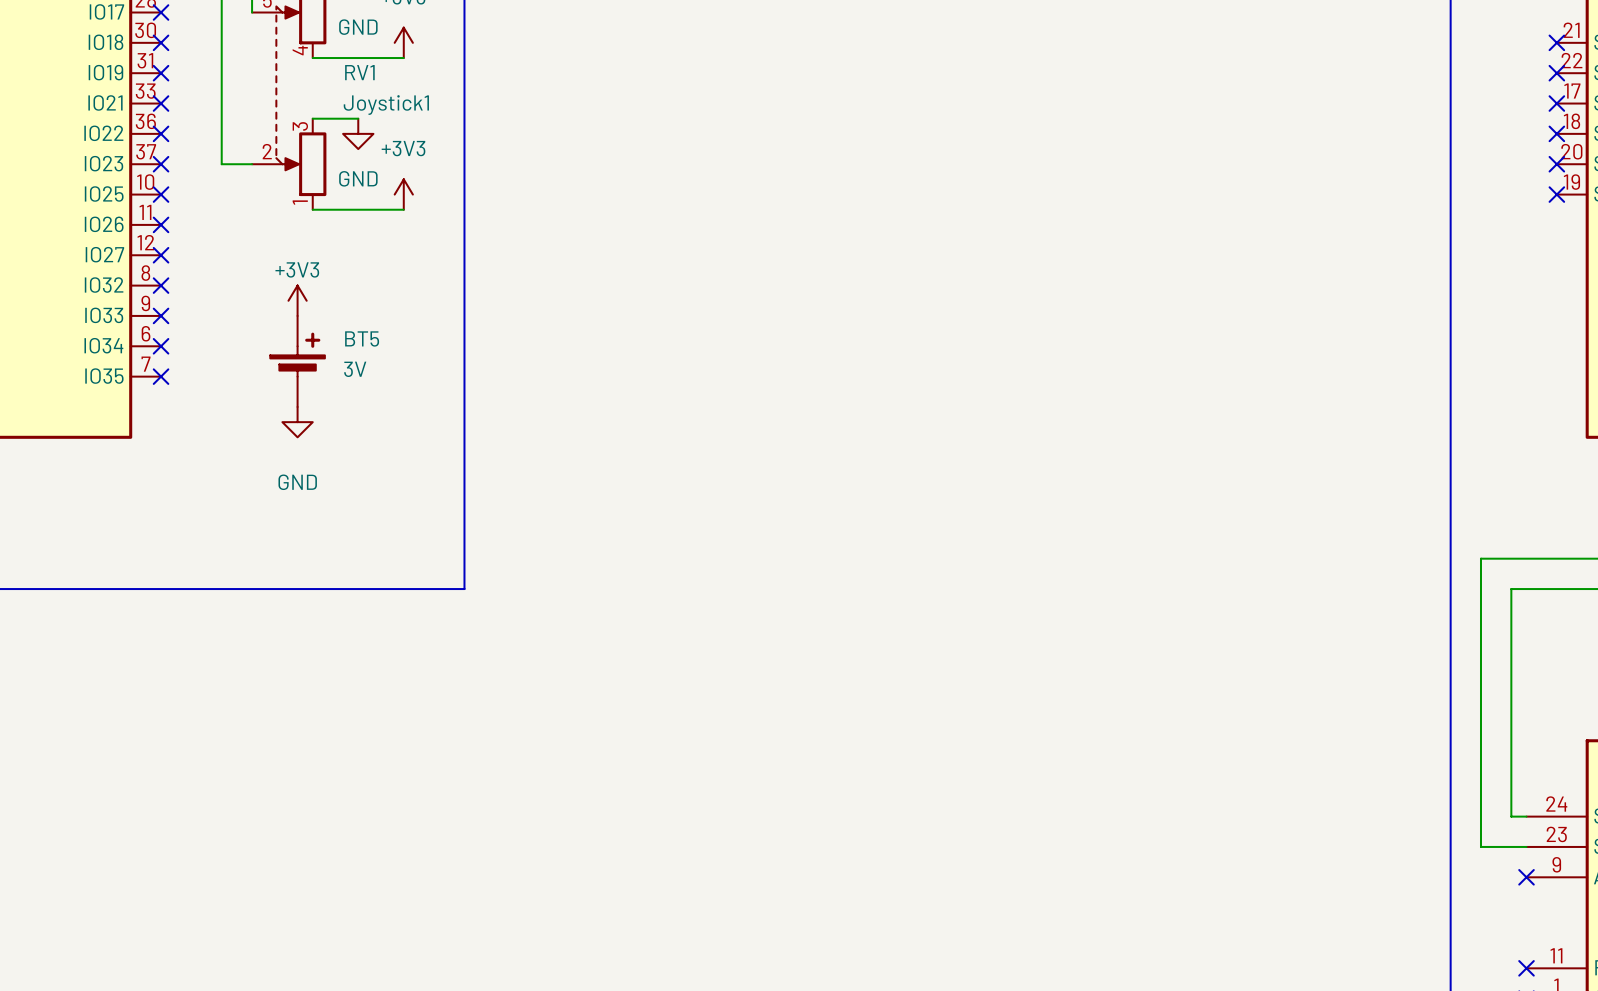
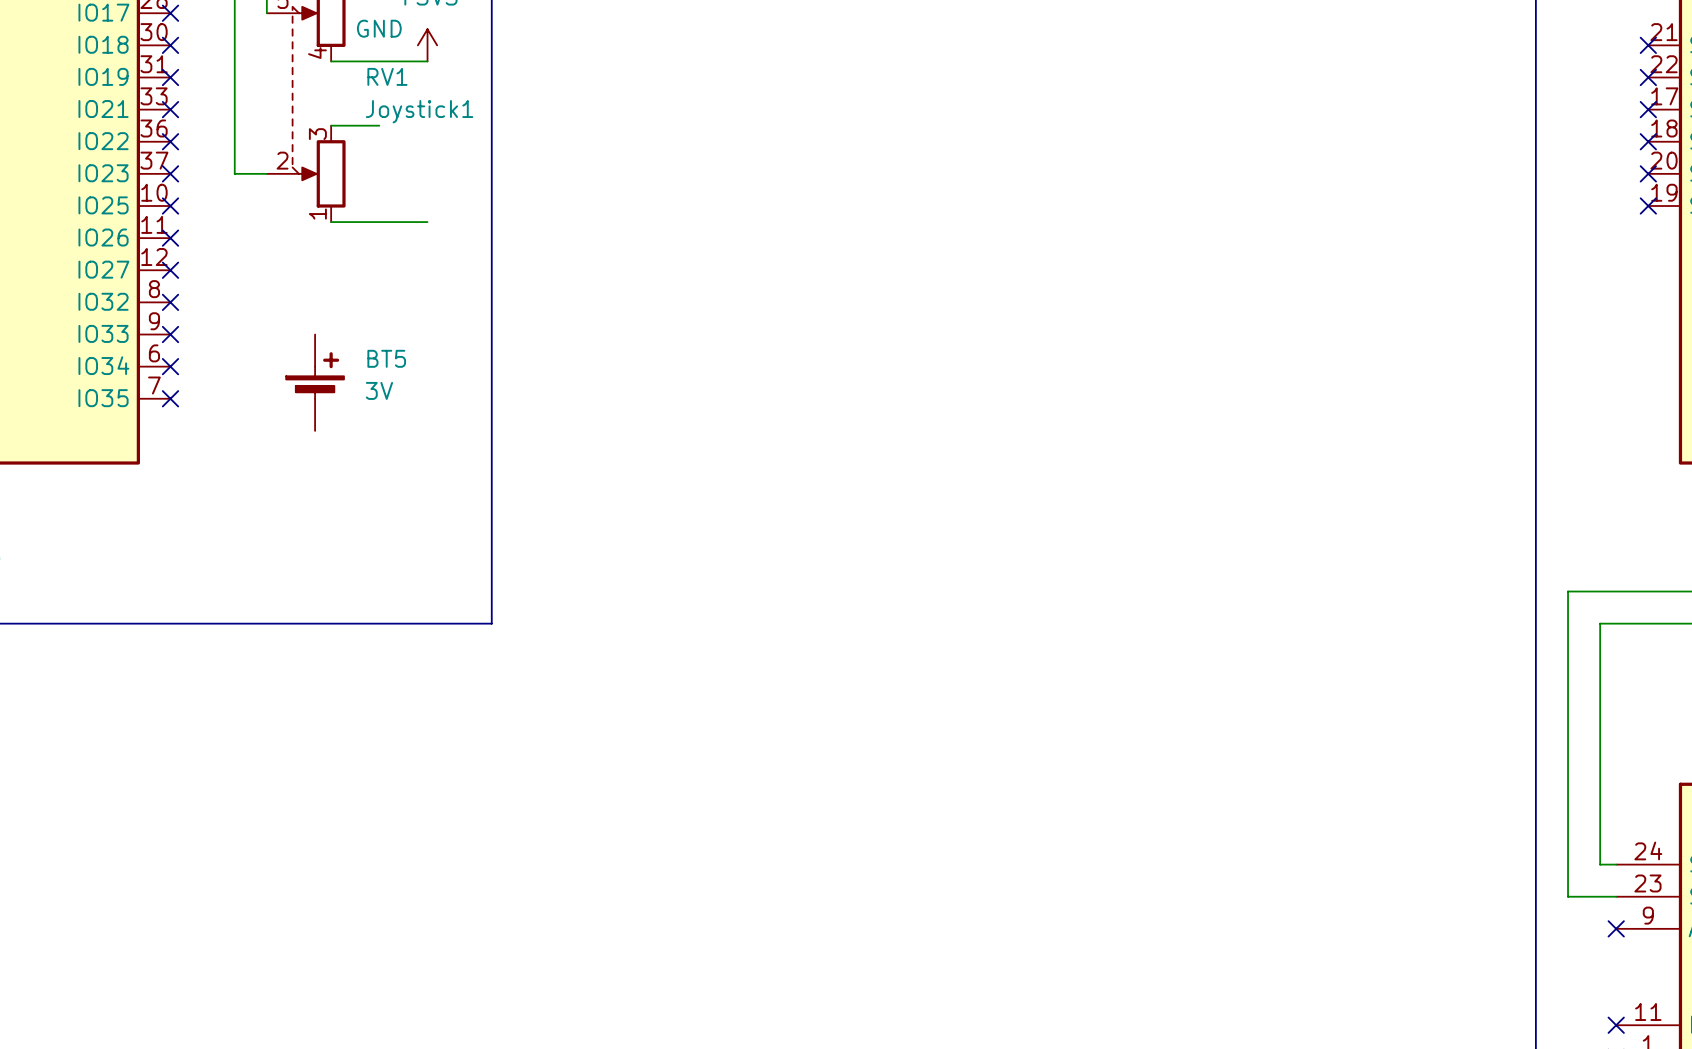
power symbol: GND (358, 133) -> none
power symbol: +3V3 (403, 194) -> none
power symbol: +3V3 (297, 300) -> none
power symbol: GND (297, 422) -> none

